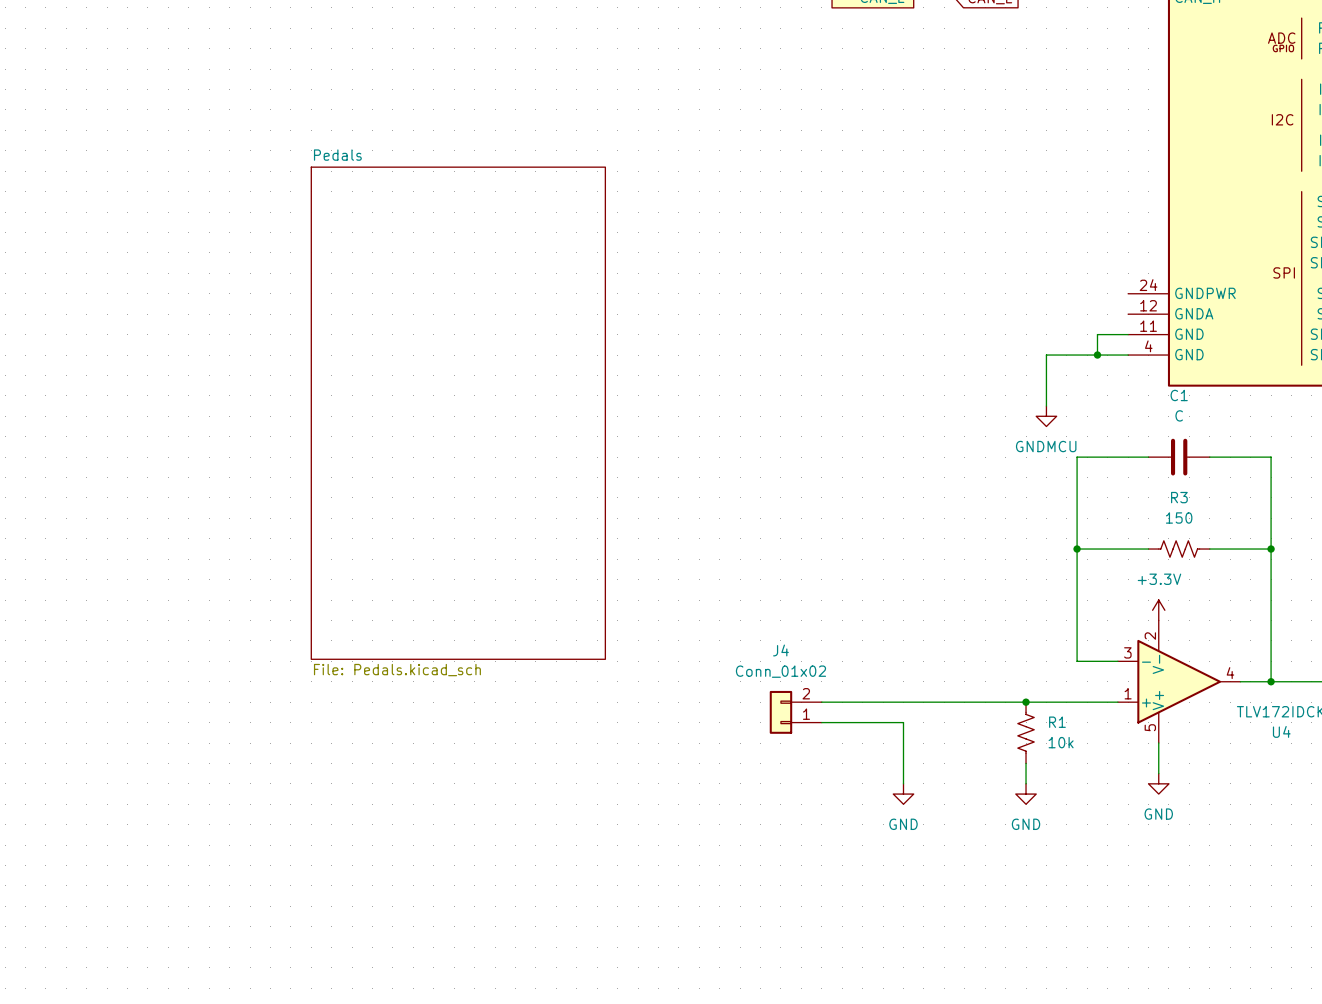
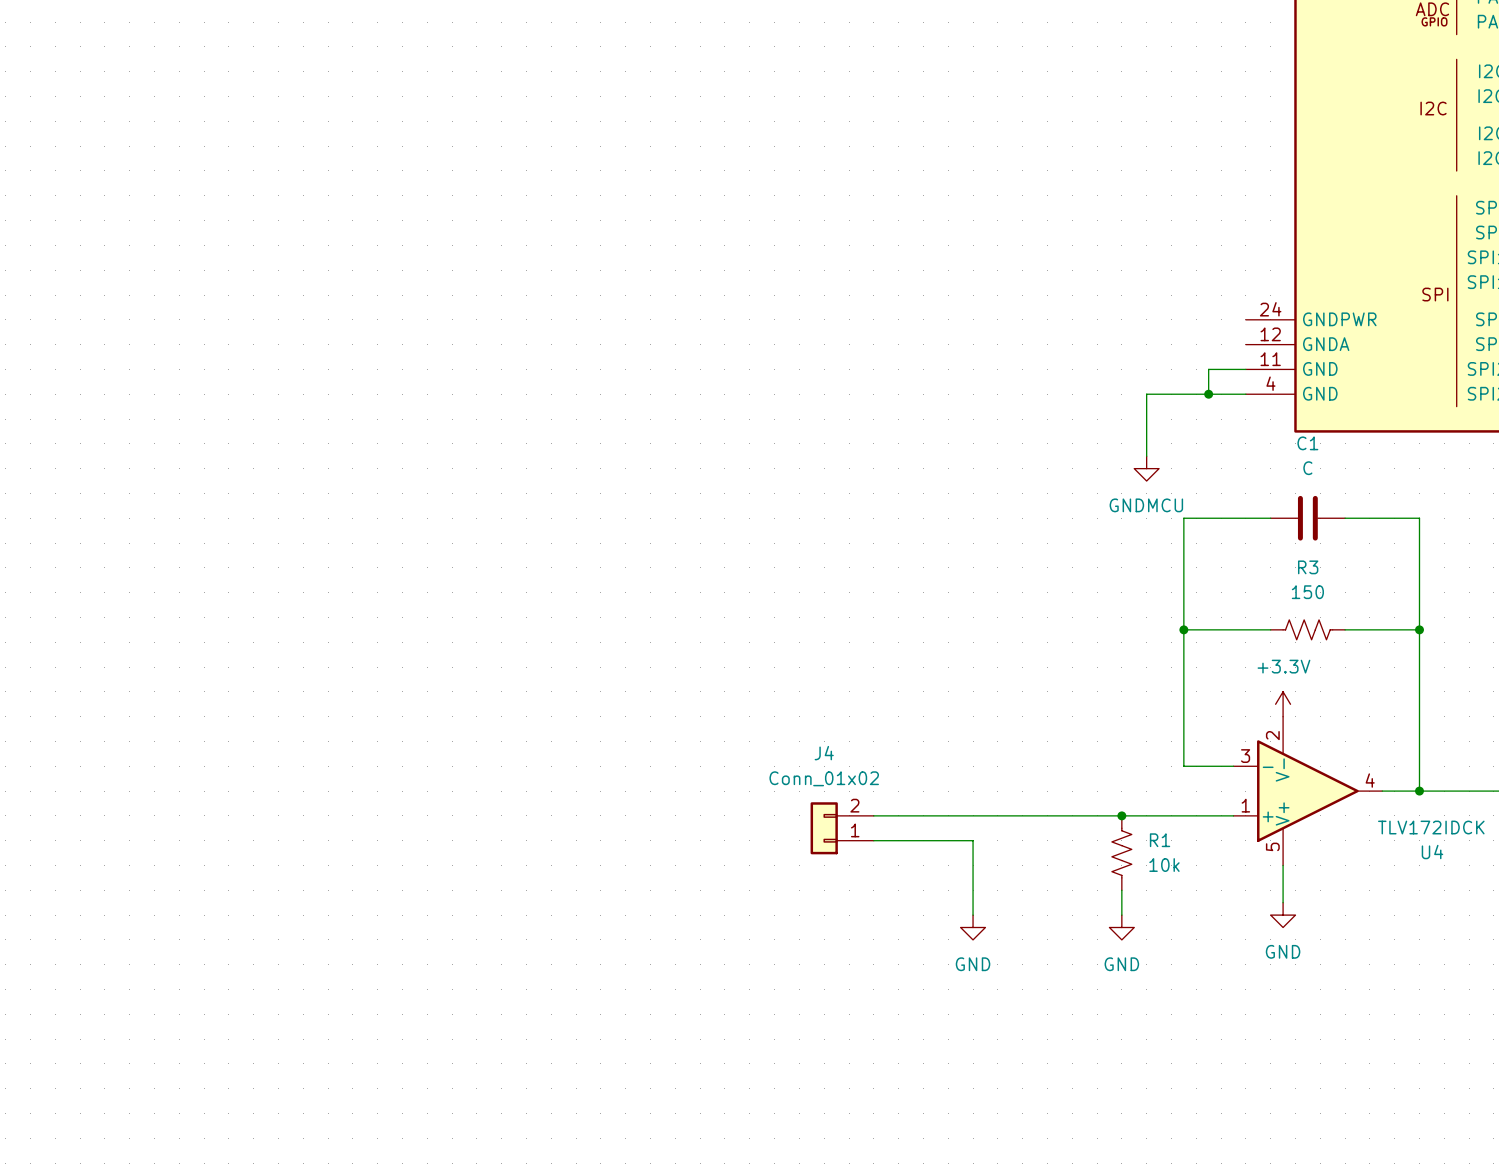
sheet Pedals: File: Pedals.kicad_sch (458, 413) -> none

